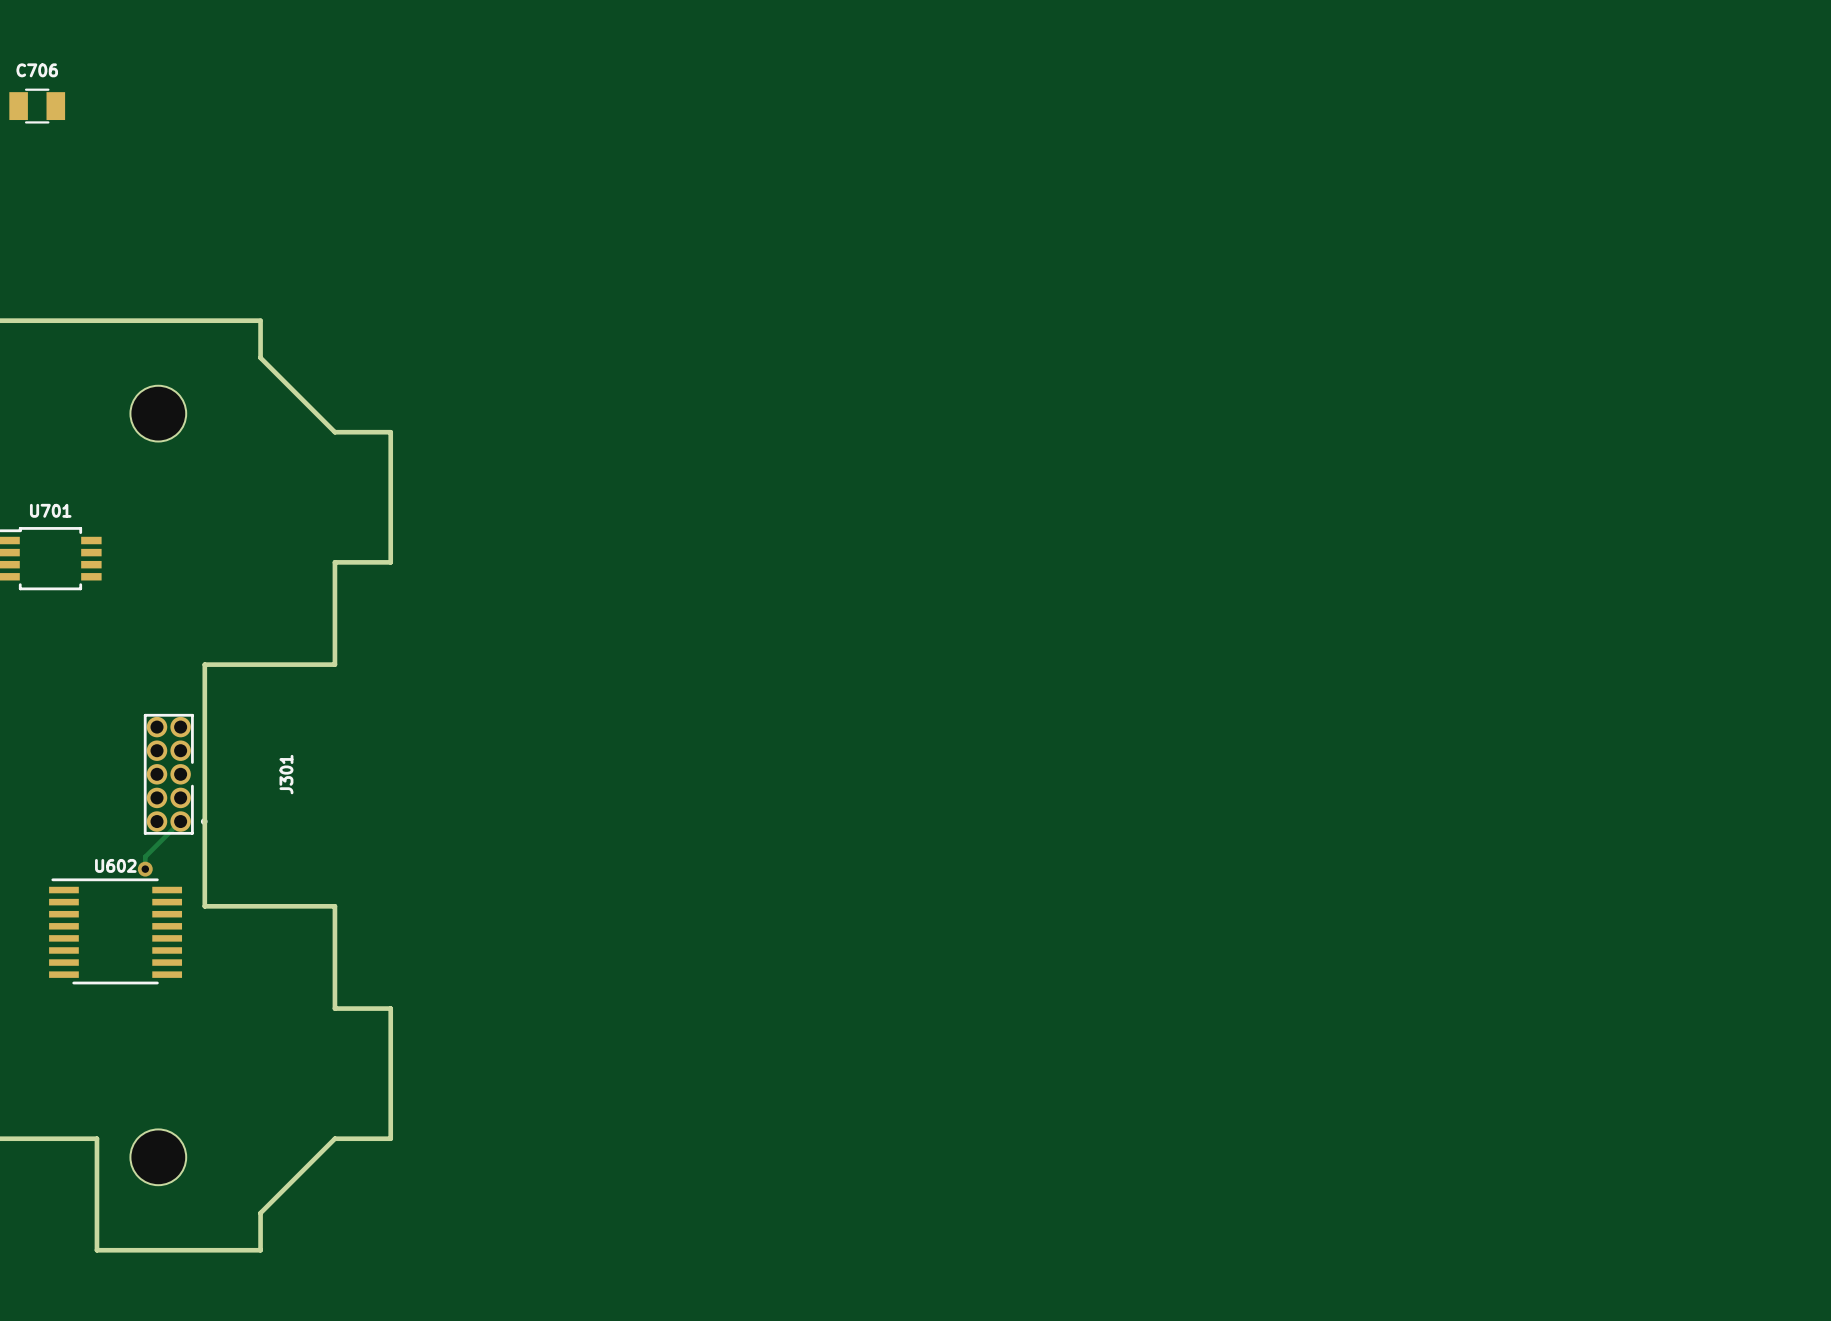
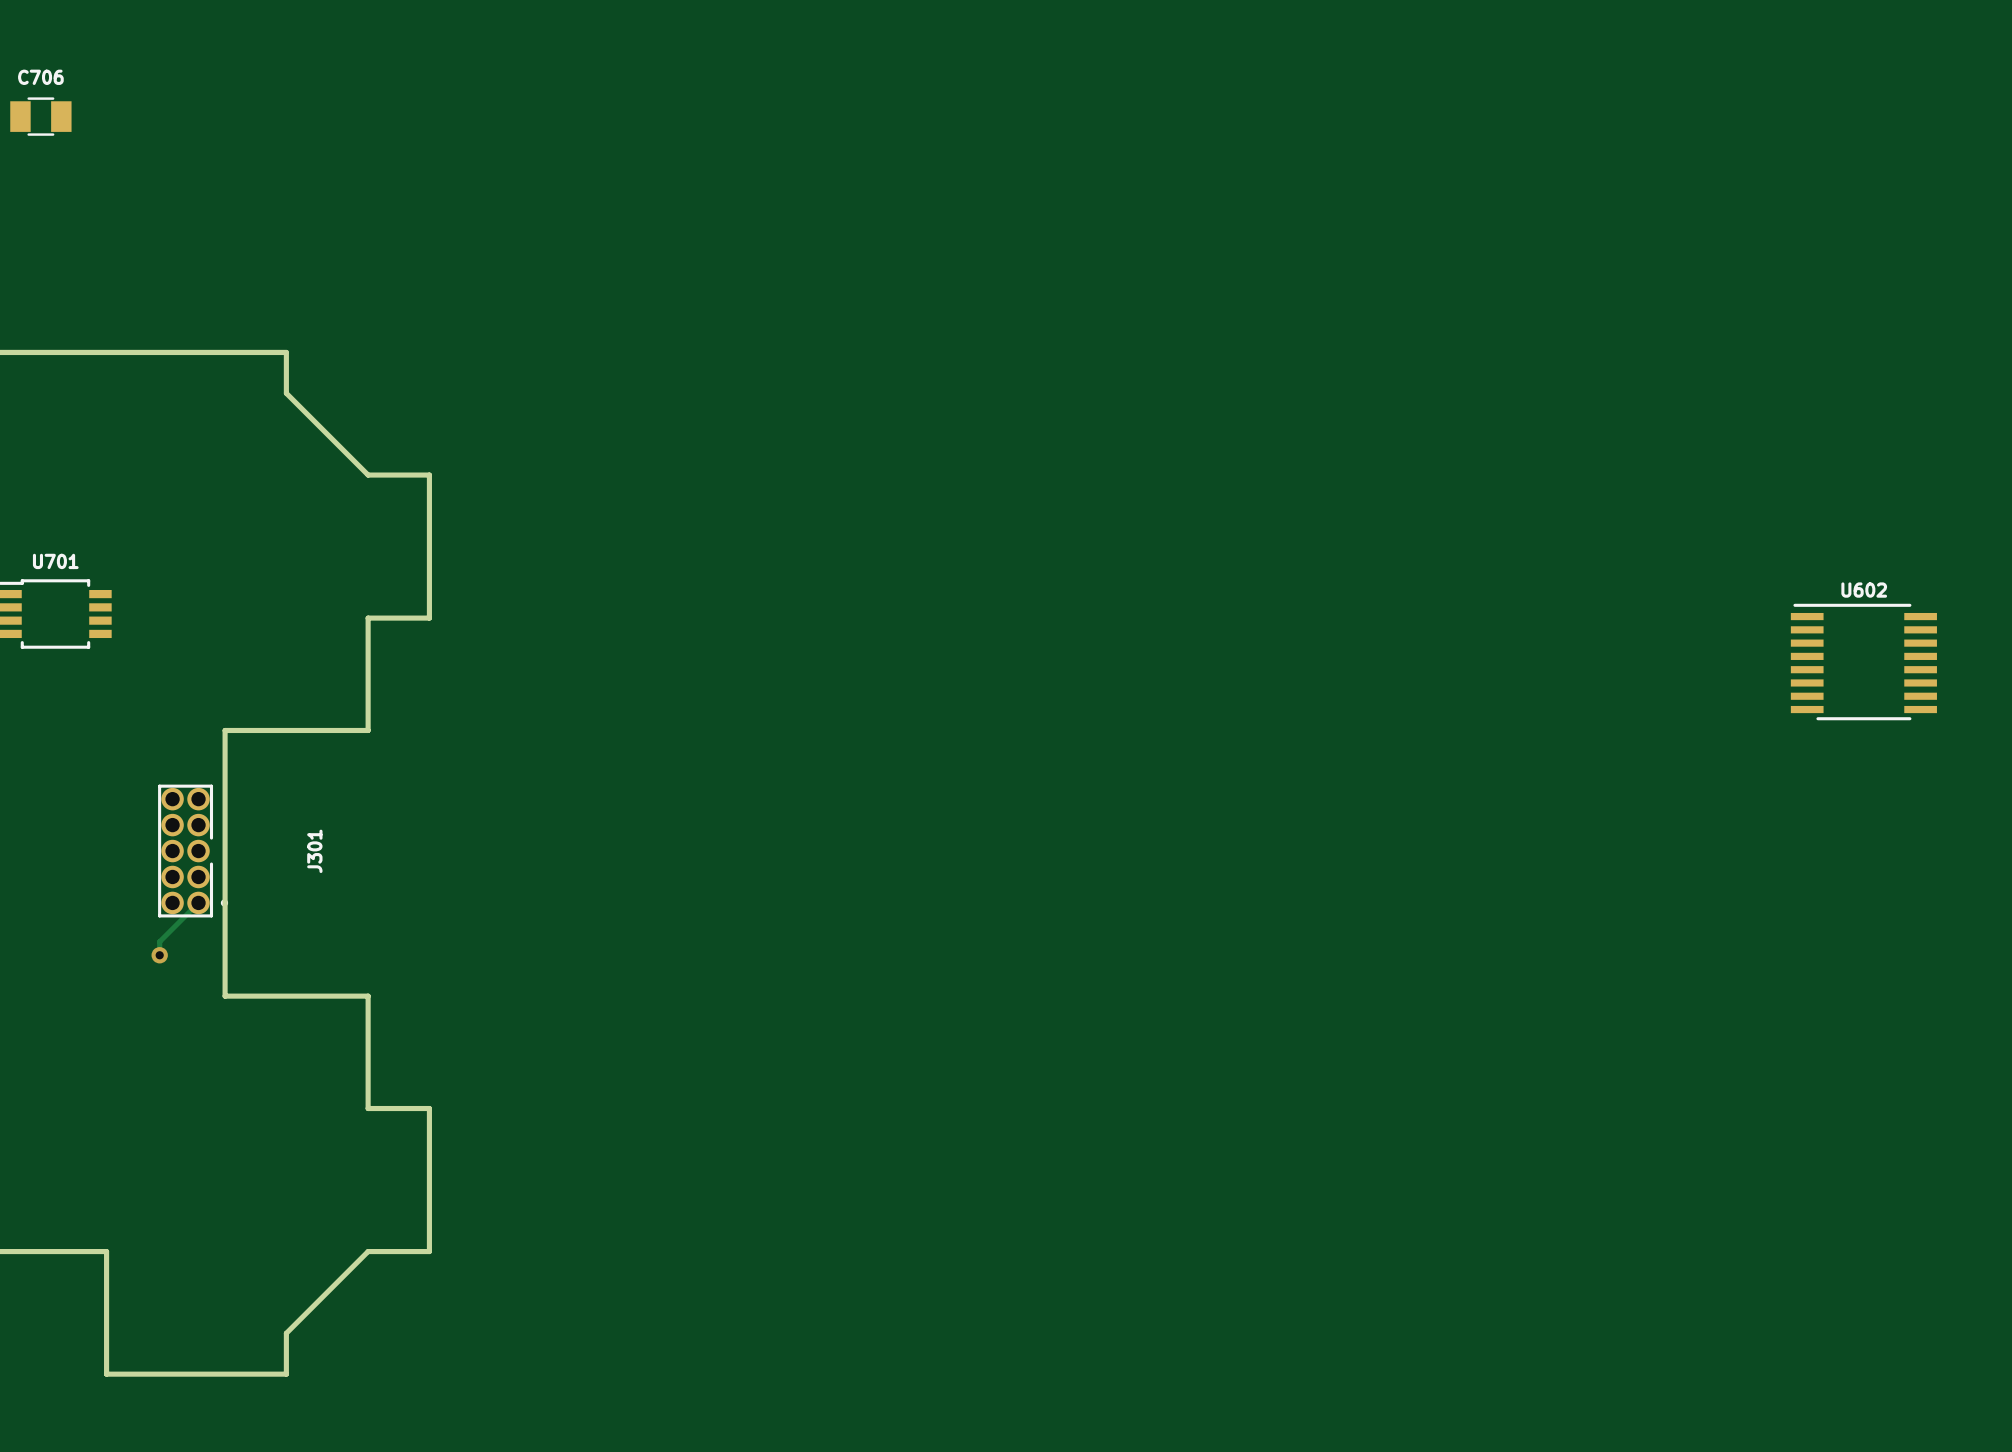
part: (158, 413) -> none
U602 position: (115, 931) -> (1863, 662)
part: (158, 1157) -> none

